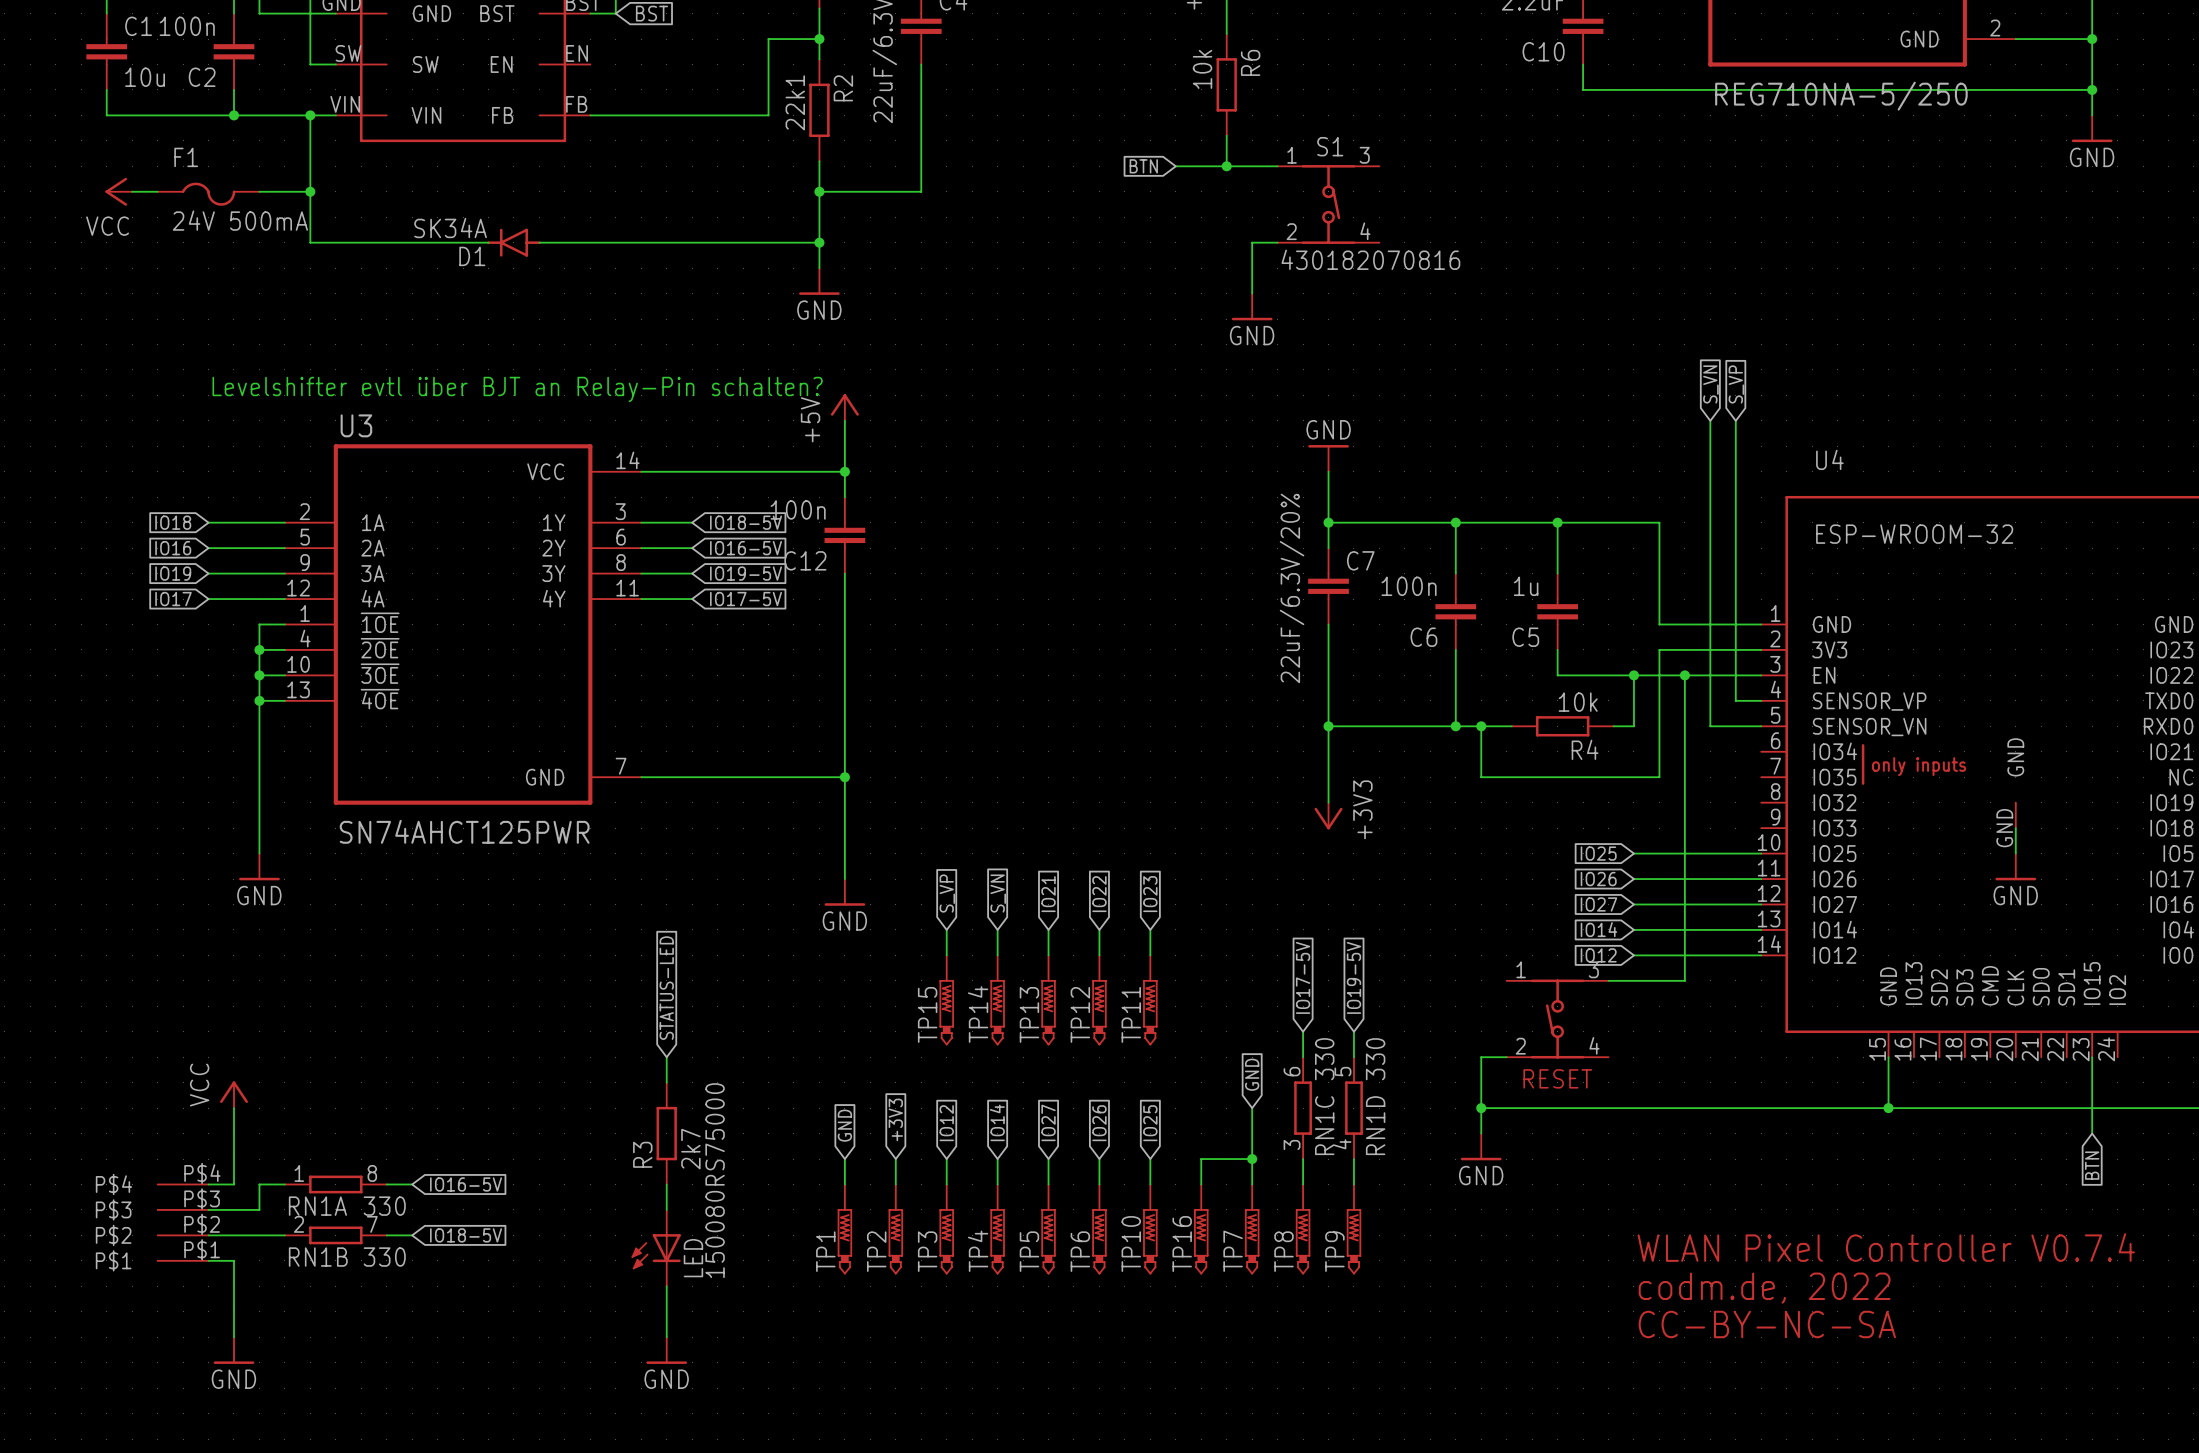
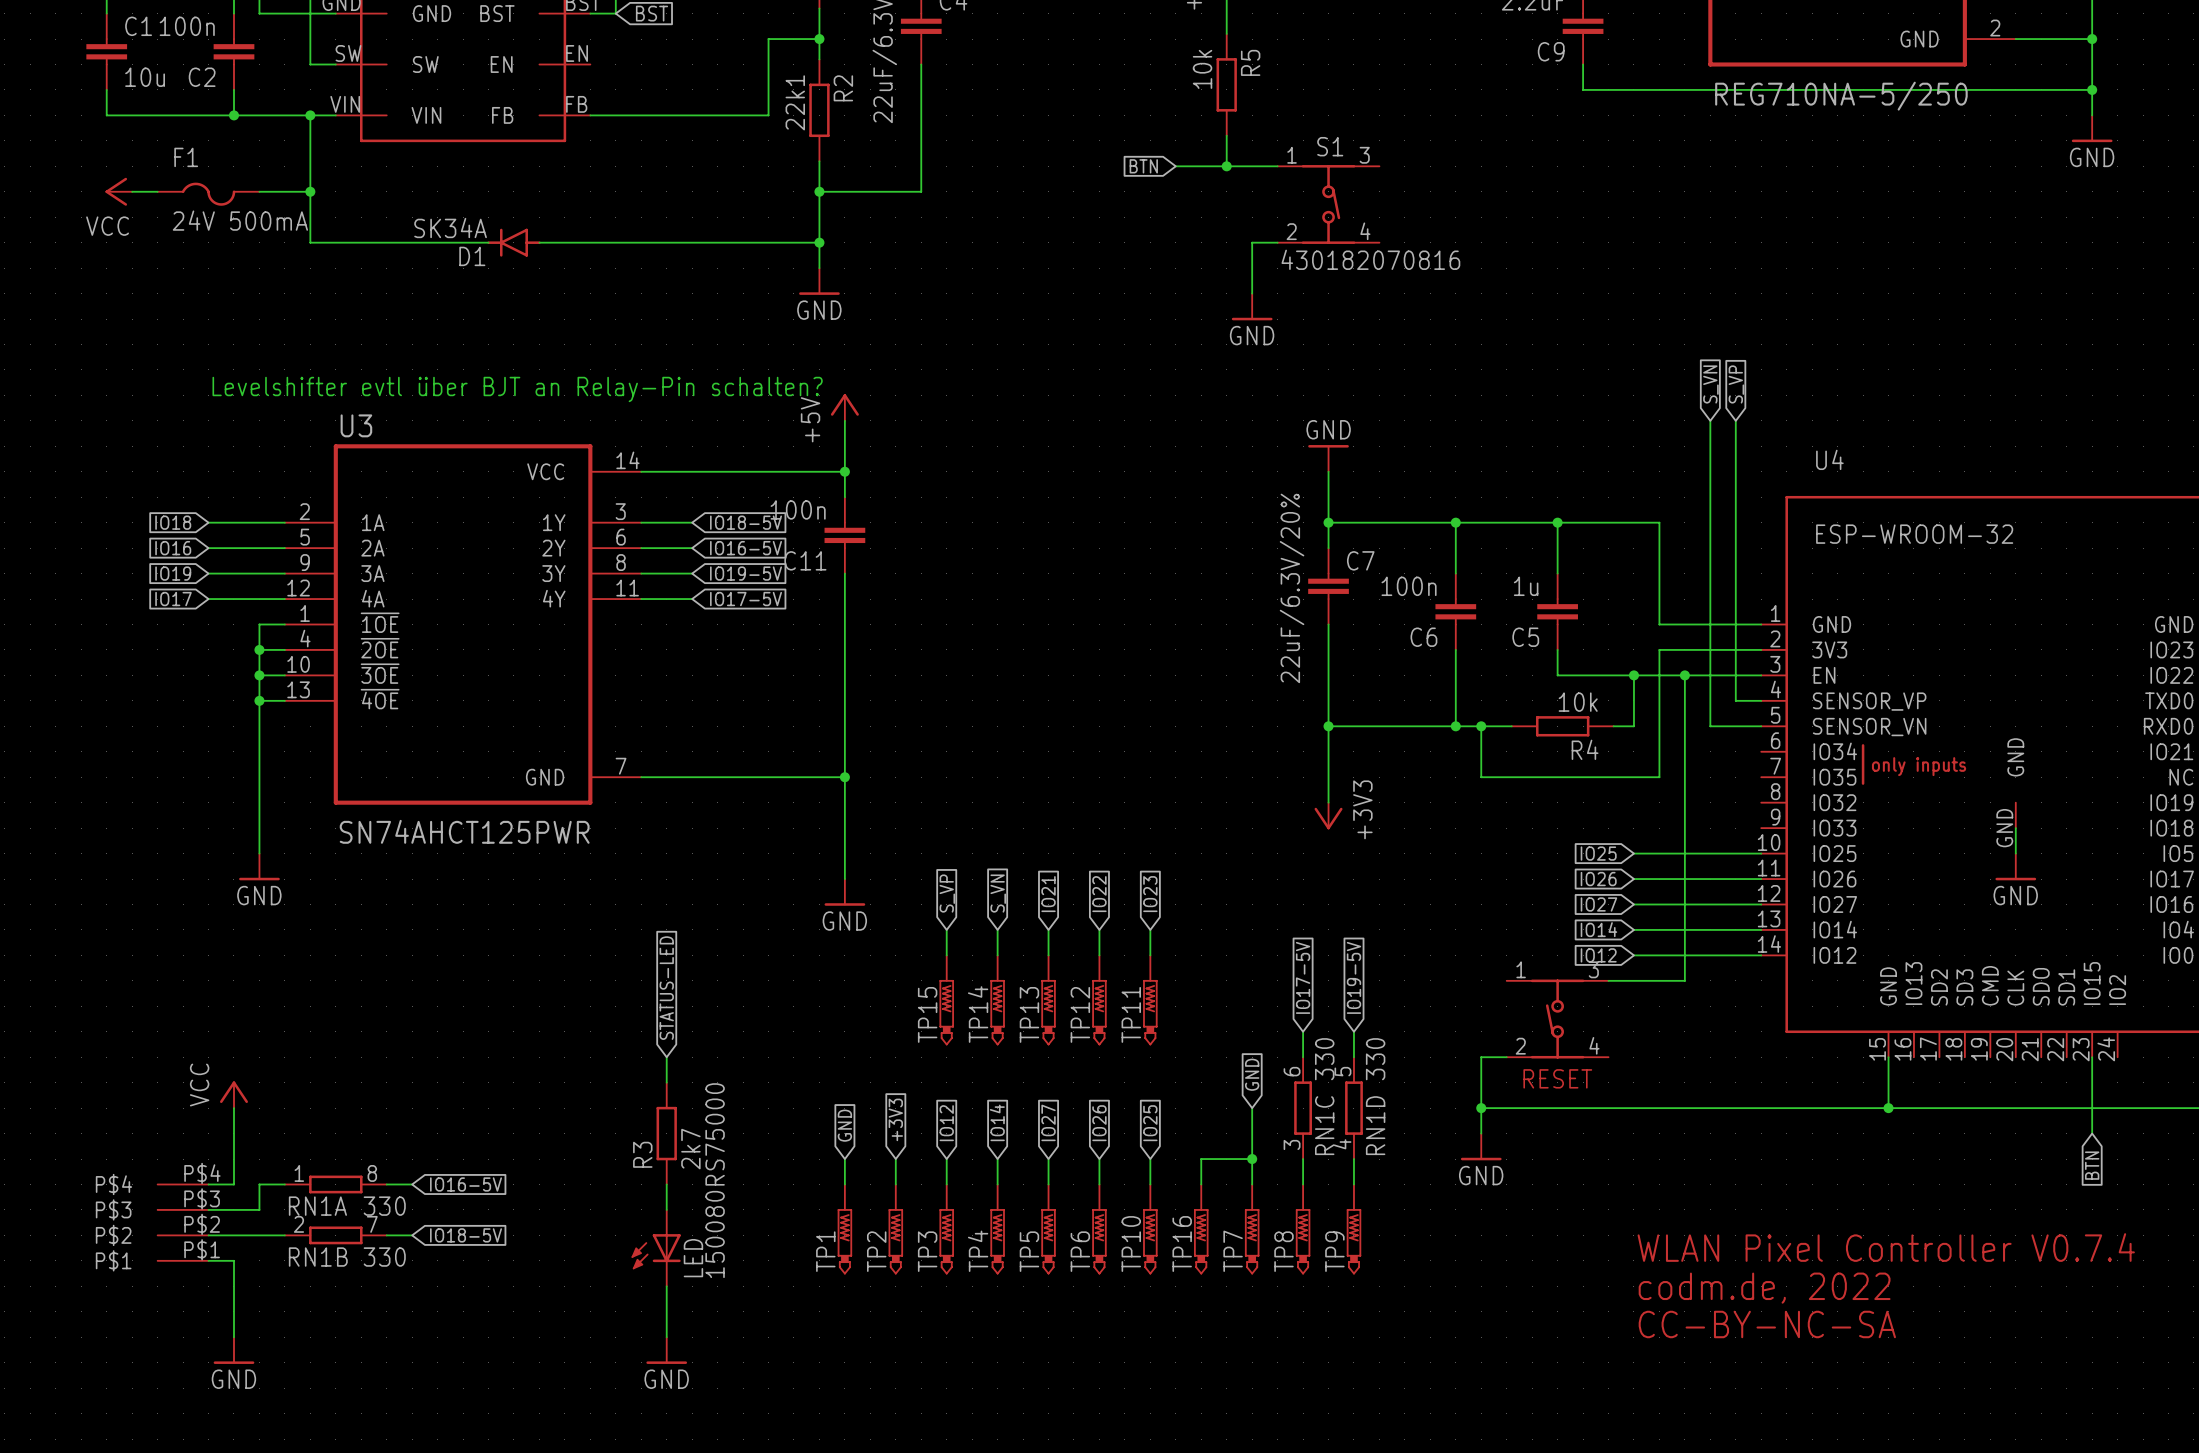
C10 name: C10 (1543, 51) -> C9 (1551, 51)
R6 name: R6 (1250, 62) -> R5 (1250, 62)
C12 name: C12 (805, 560) -> C11 (805, 560)

